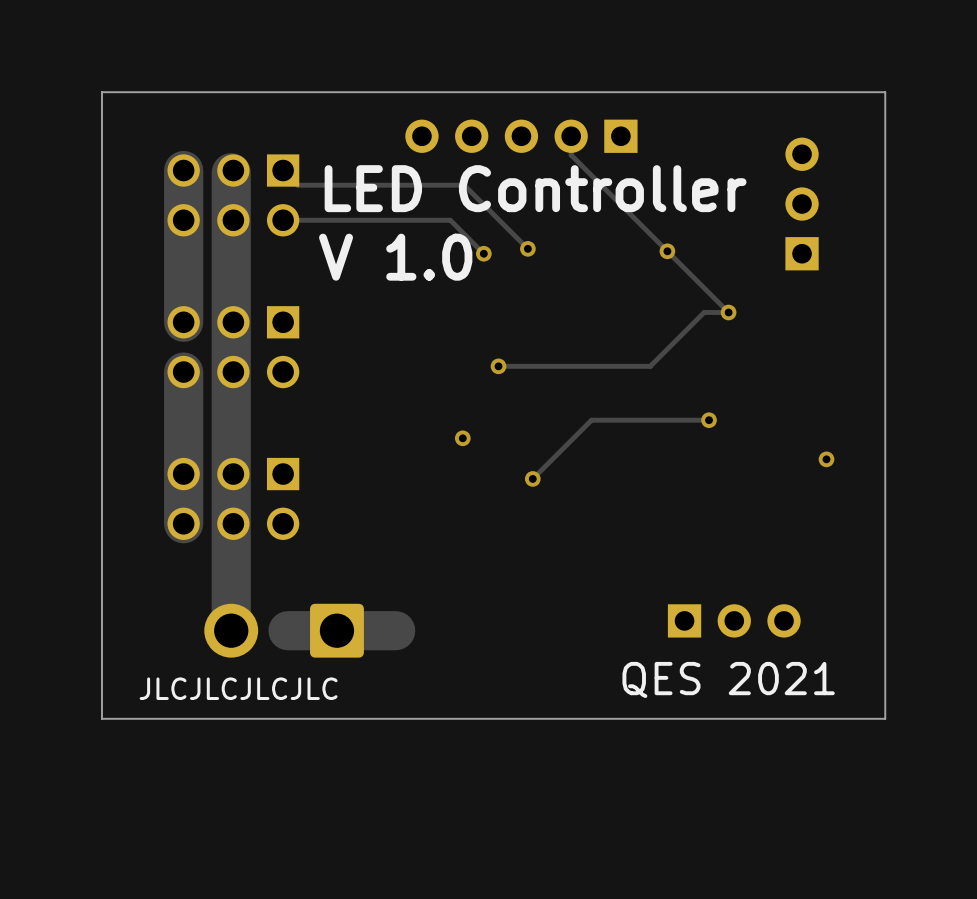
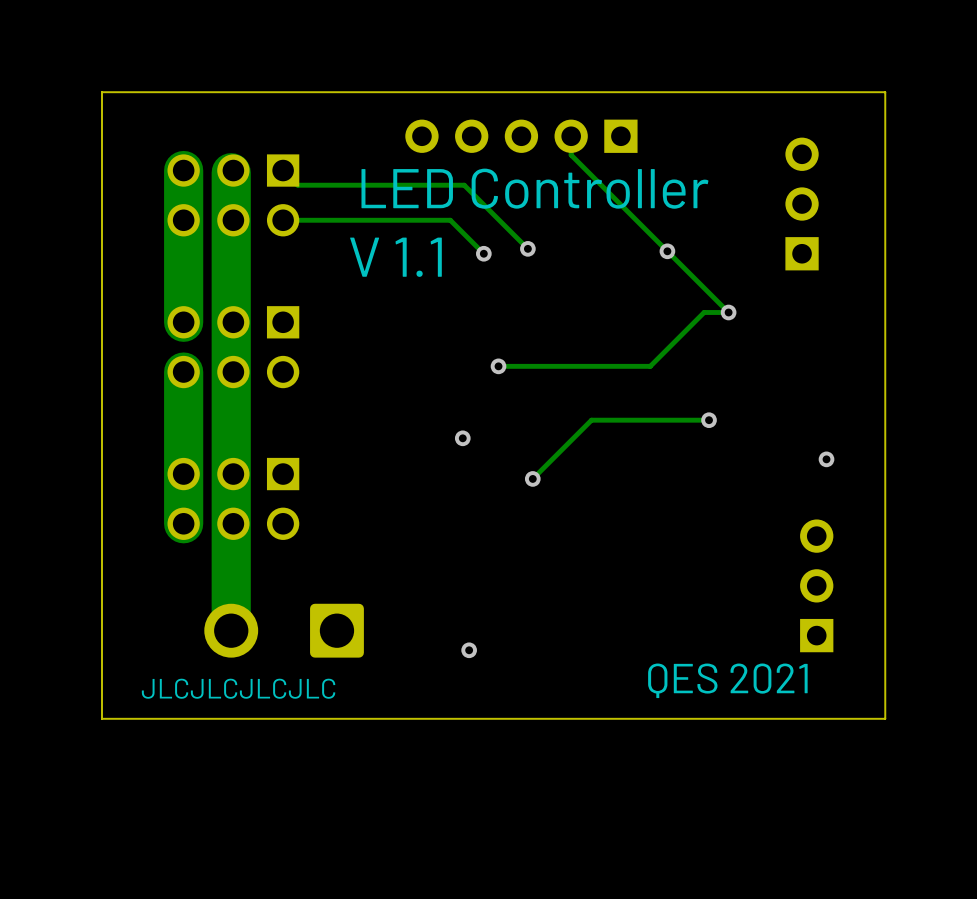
text: V 1.0 (395, 257) -> V 1.1 (395, 257)
part rotation: 0° (734, 620) -> 90° counterclockwise (816, 585)
part position: (734, 620) -> (816, 585)
track: (395, 630) (288, 630) -> none
via: none -> (469, 650)

